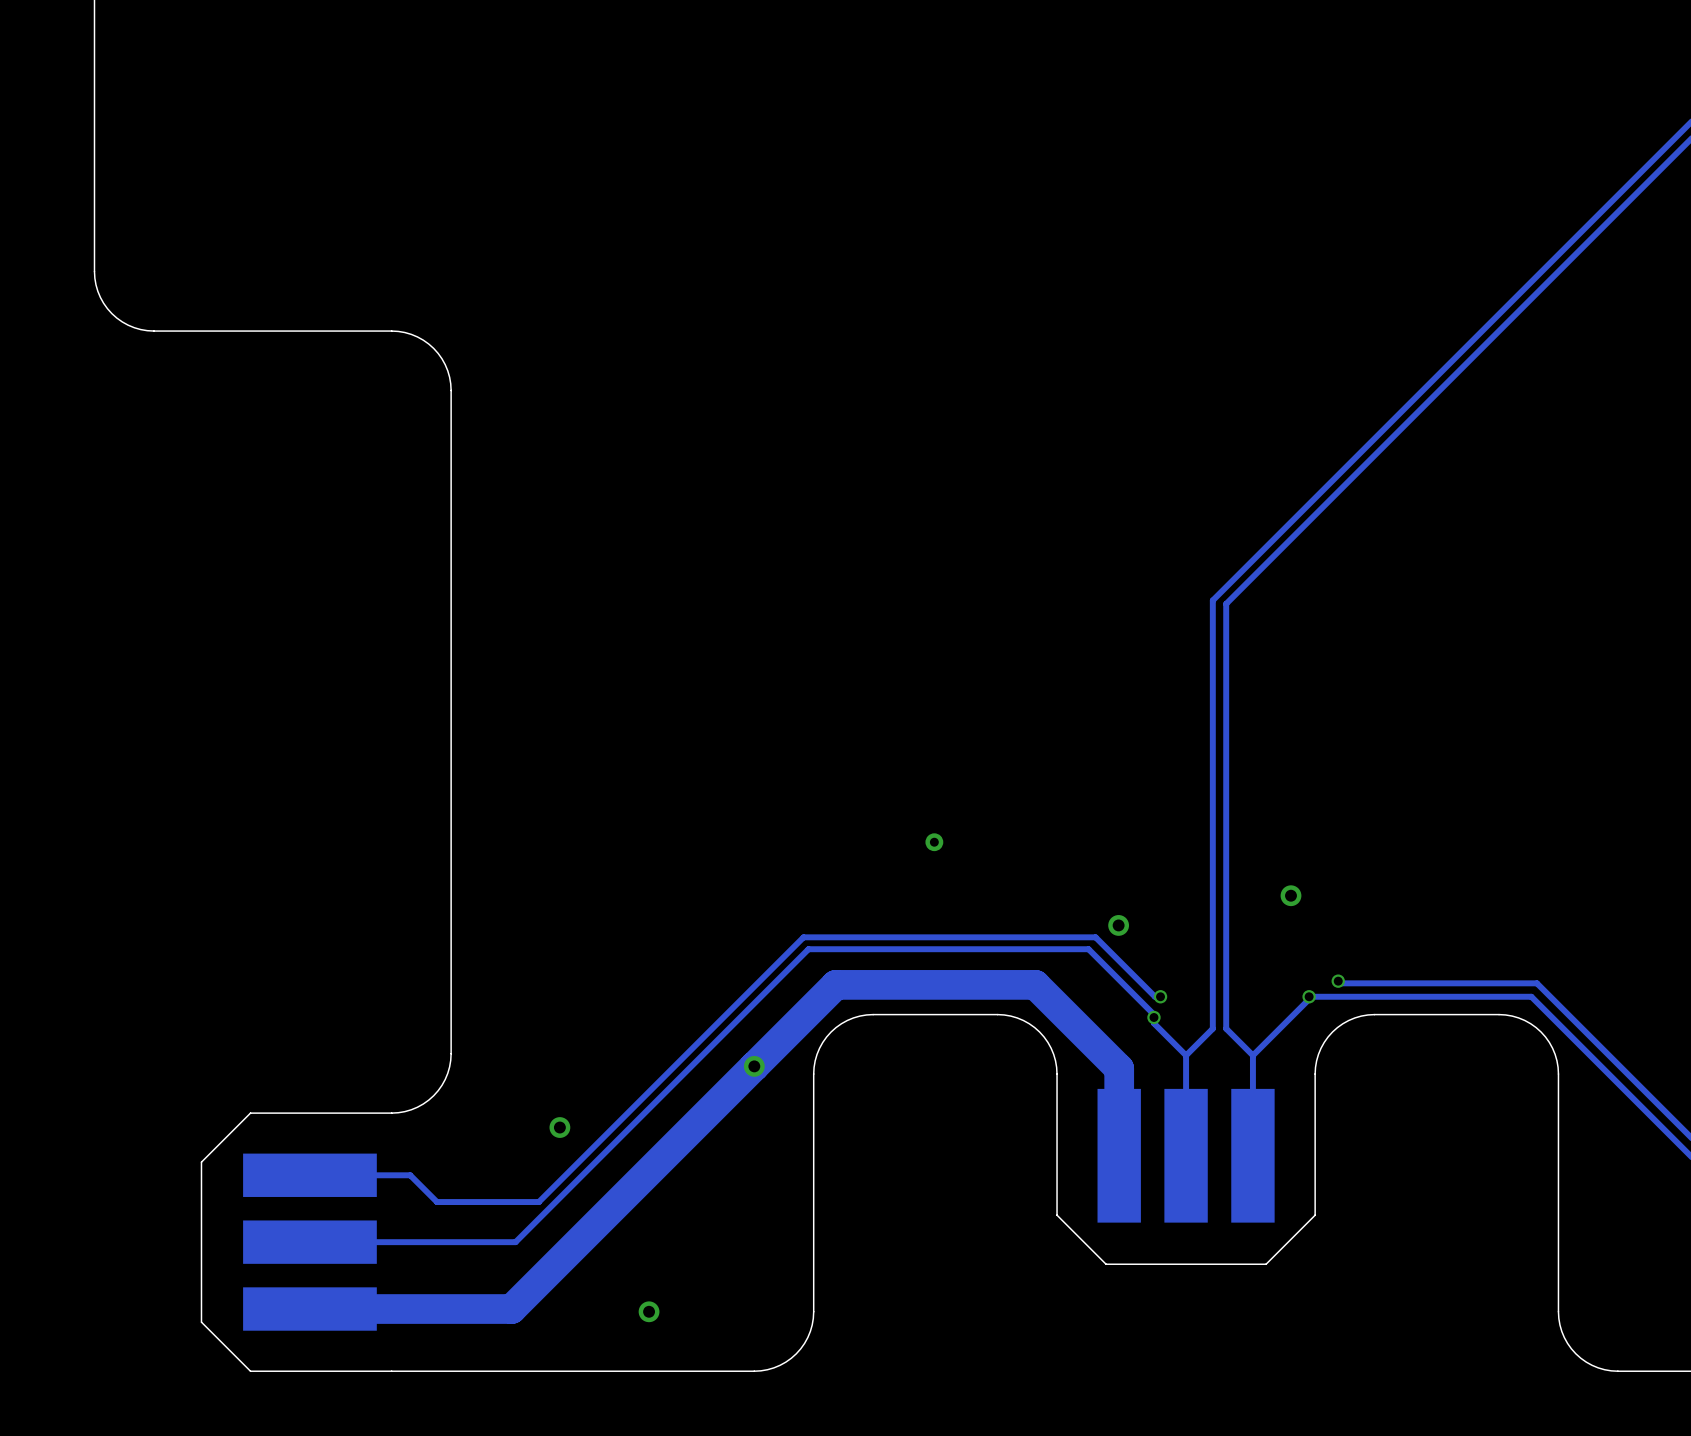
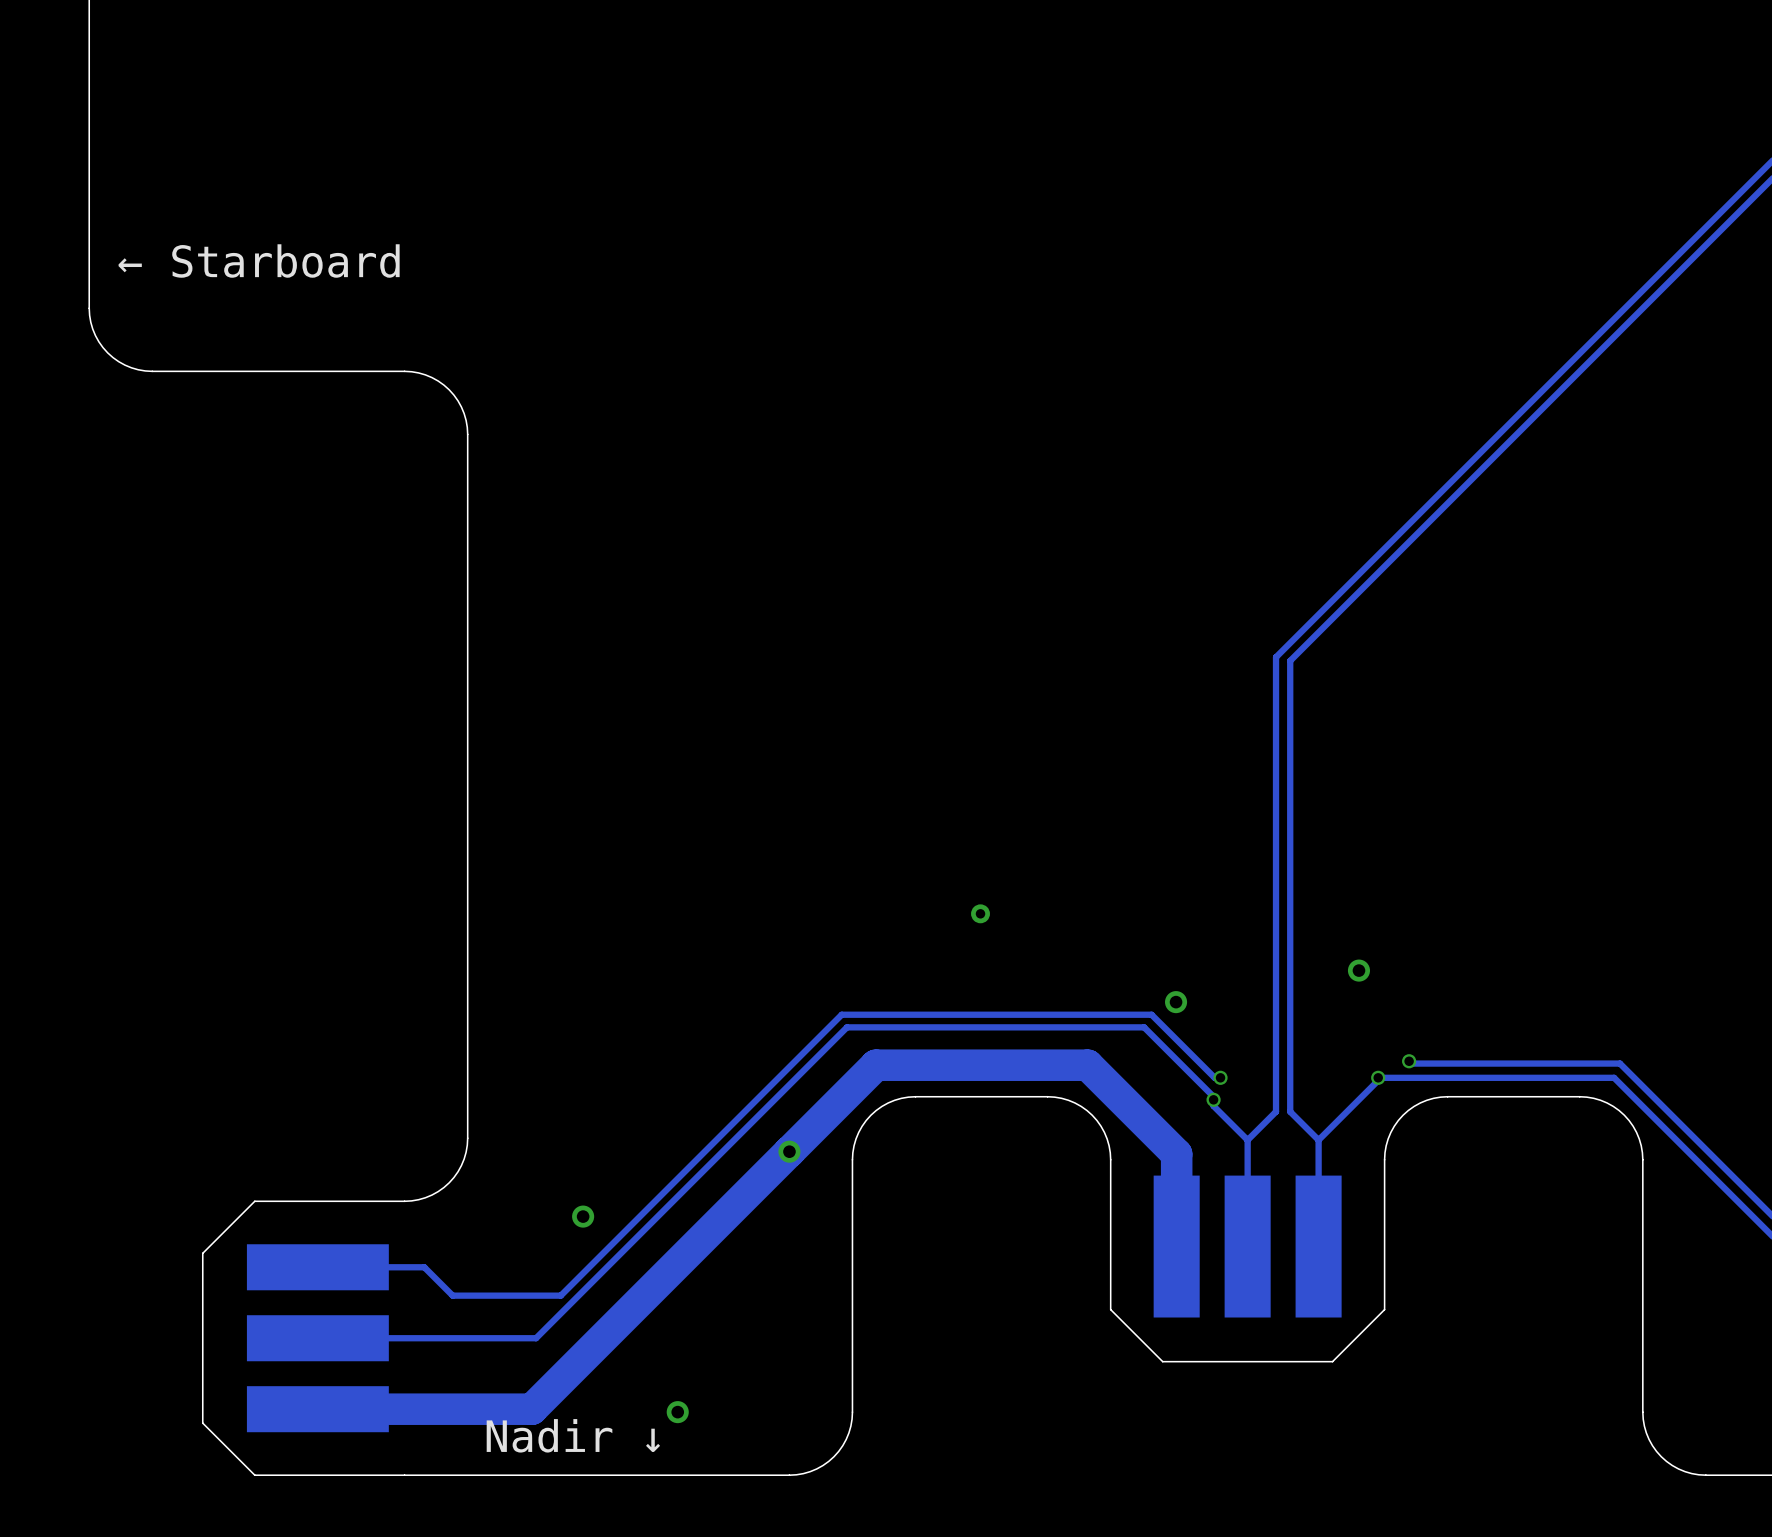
part text: none -> ← Starboard (259, 261)
part text: none -> Nadir ↓ (573, 1435)

